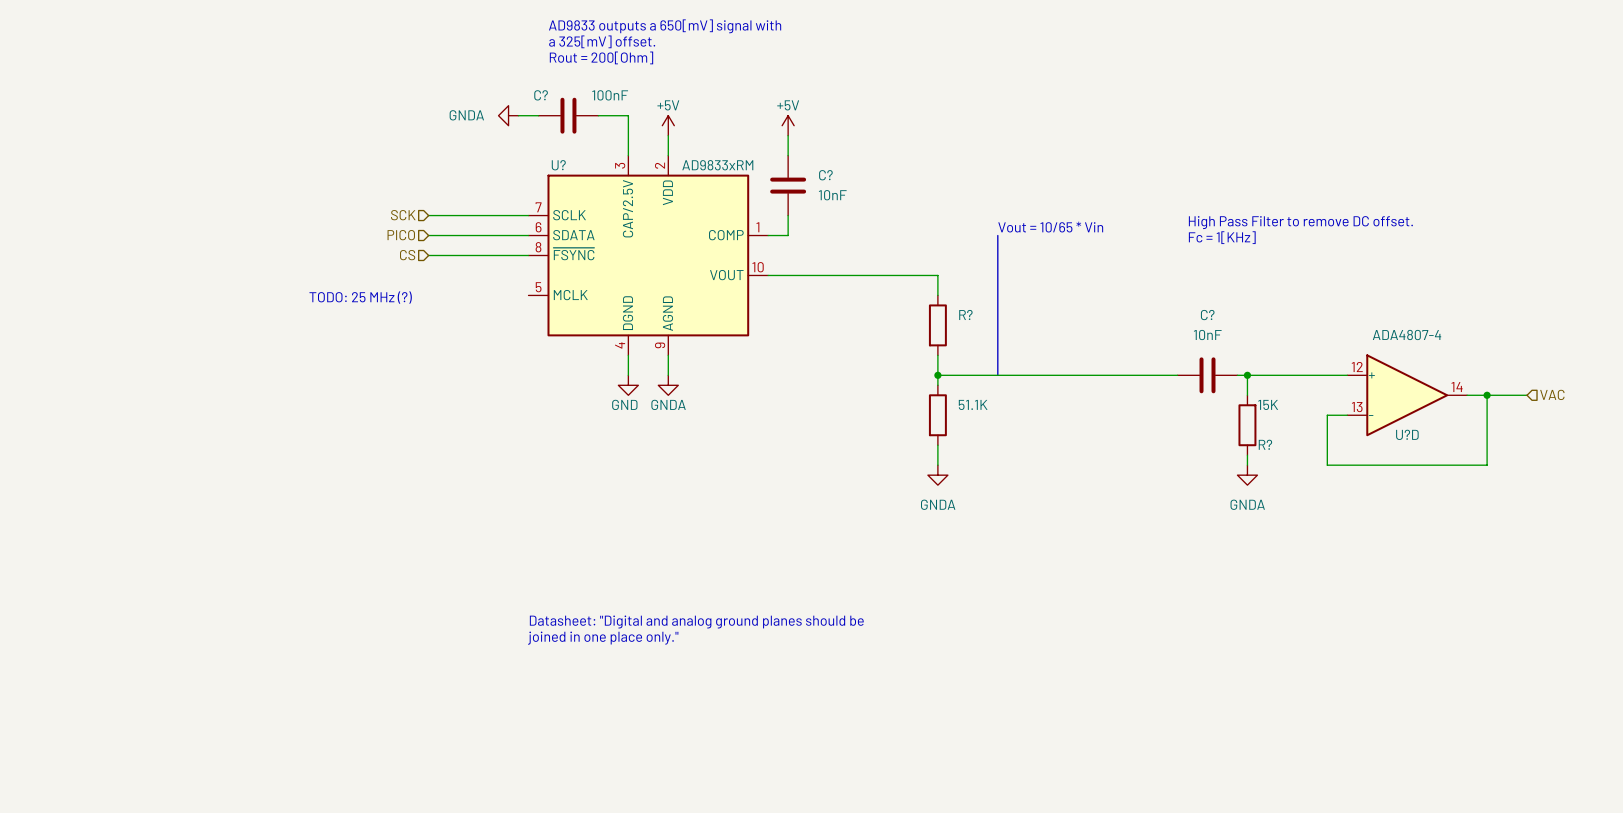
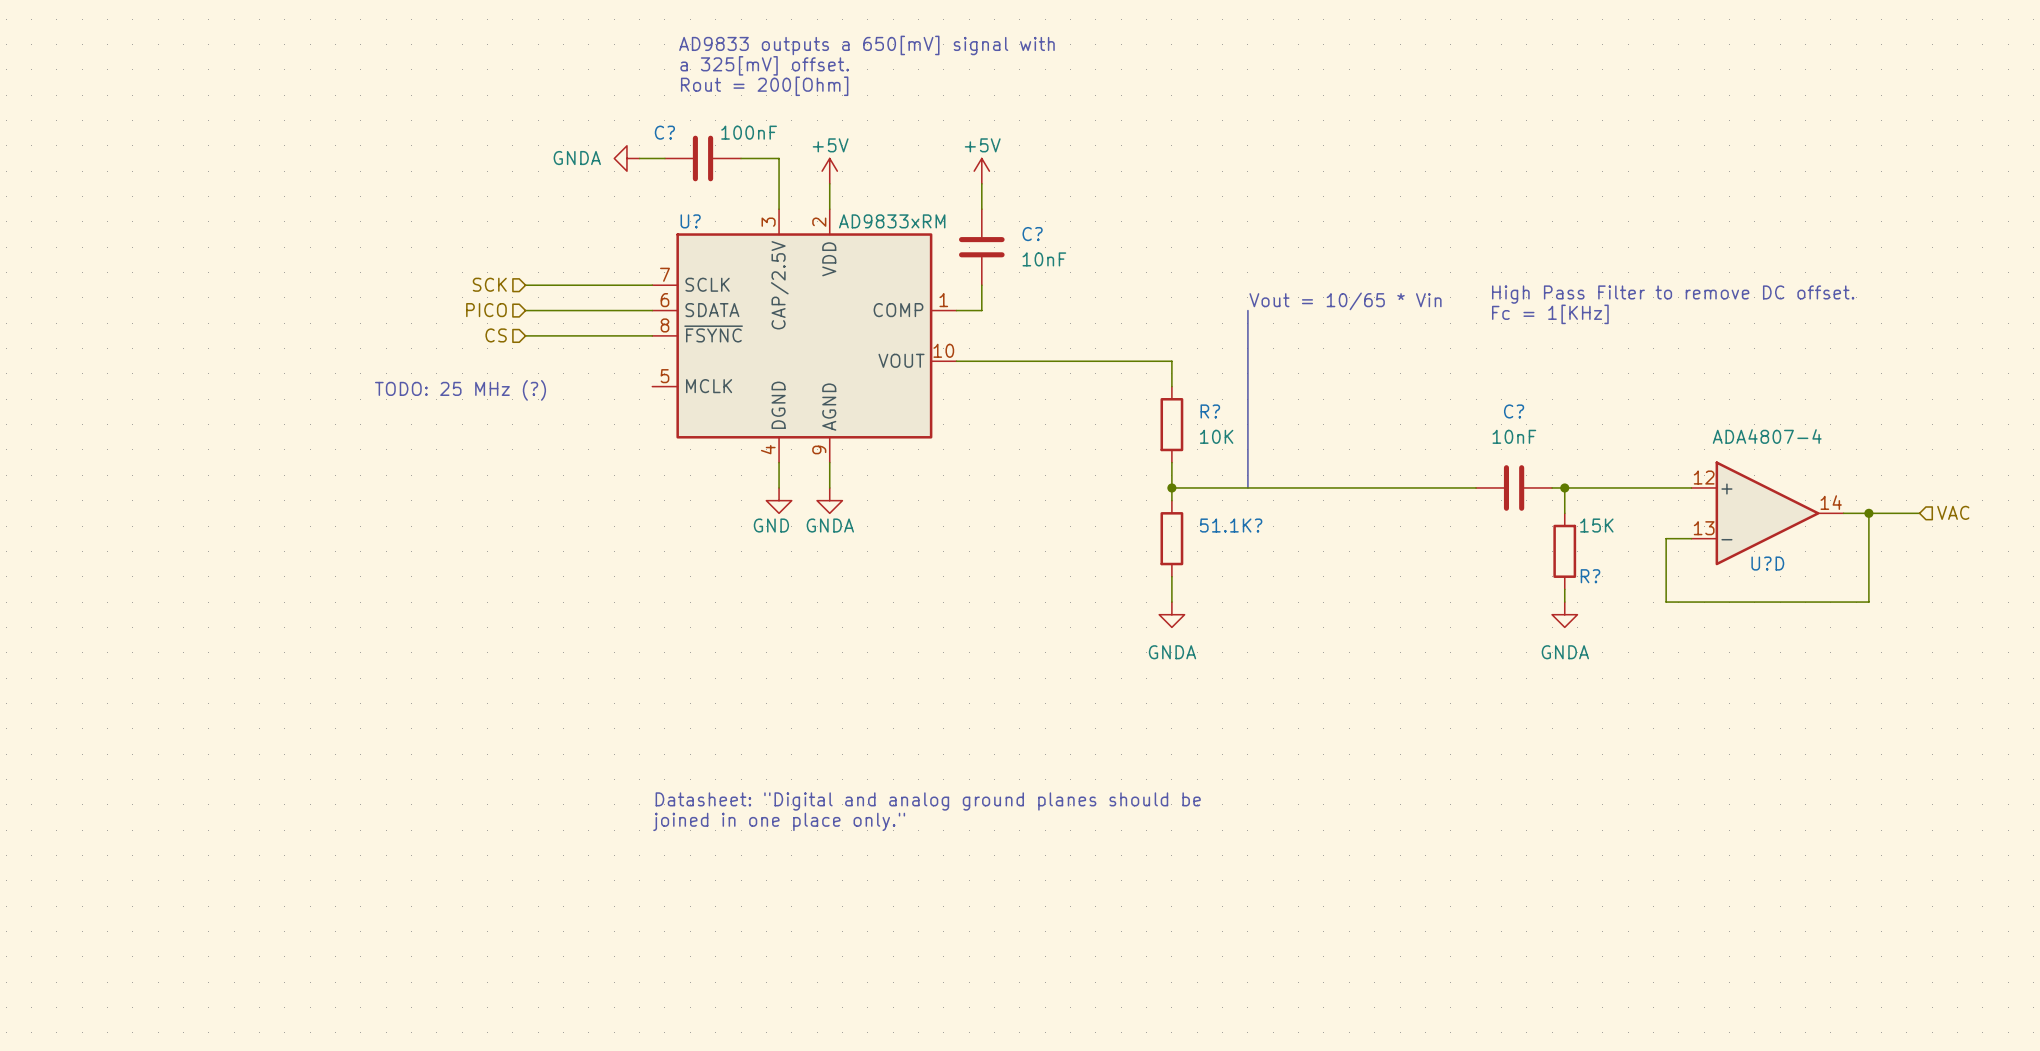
R? value: none -> 10K (1216, 436)
51.1K name: 51.1K (973, 404) -> 51.1K? (1231, 525)

